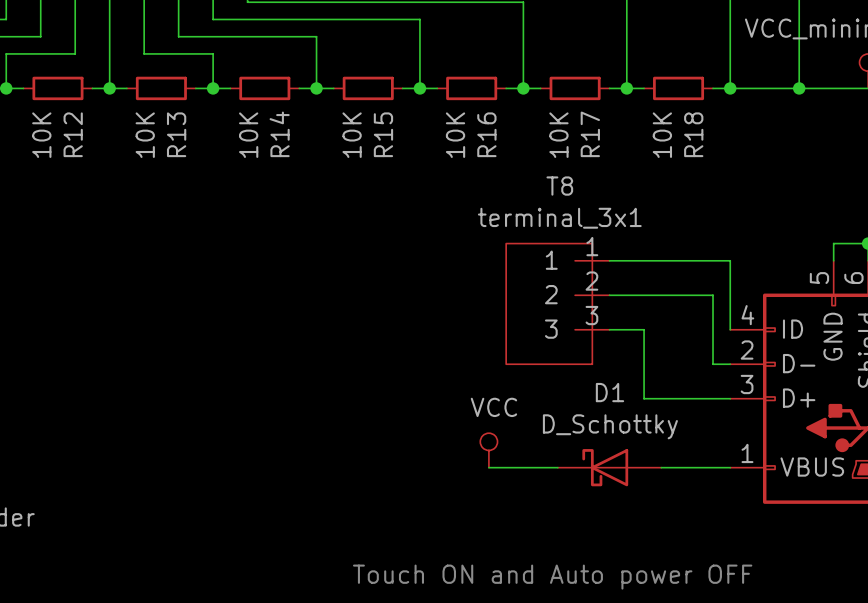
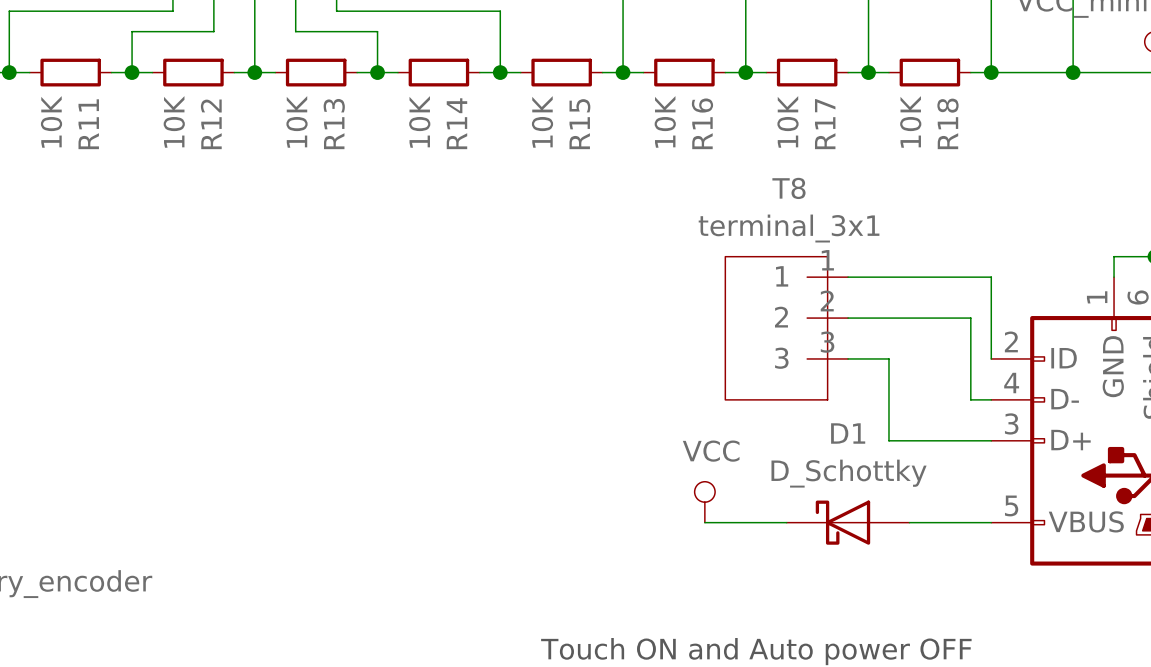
part pin number: 5 (819, 278) -> 1 (1097, 297)
part pin number: 4 (747, 315) -> 2 (1011, 341)
part pin number: 2 (747, 350) -> 4 (1011, 383)
part pin number: 1 (747, 453) -> 5 (1011, 505)

